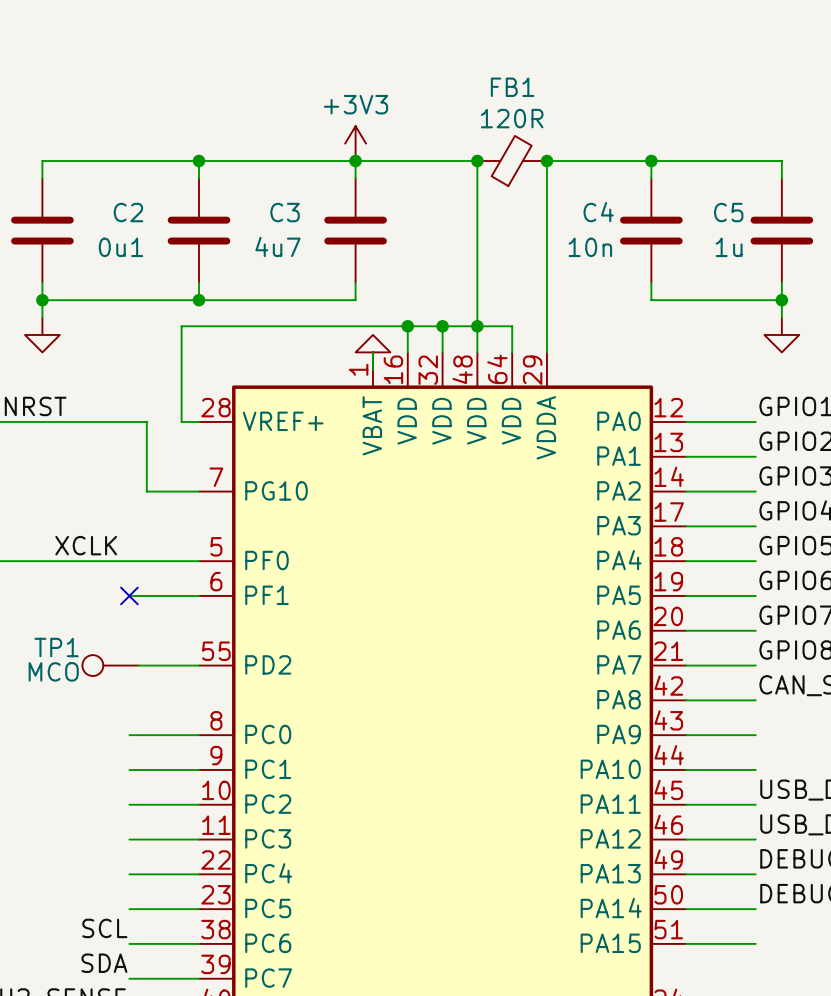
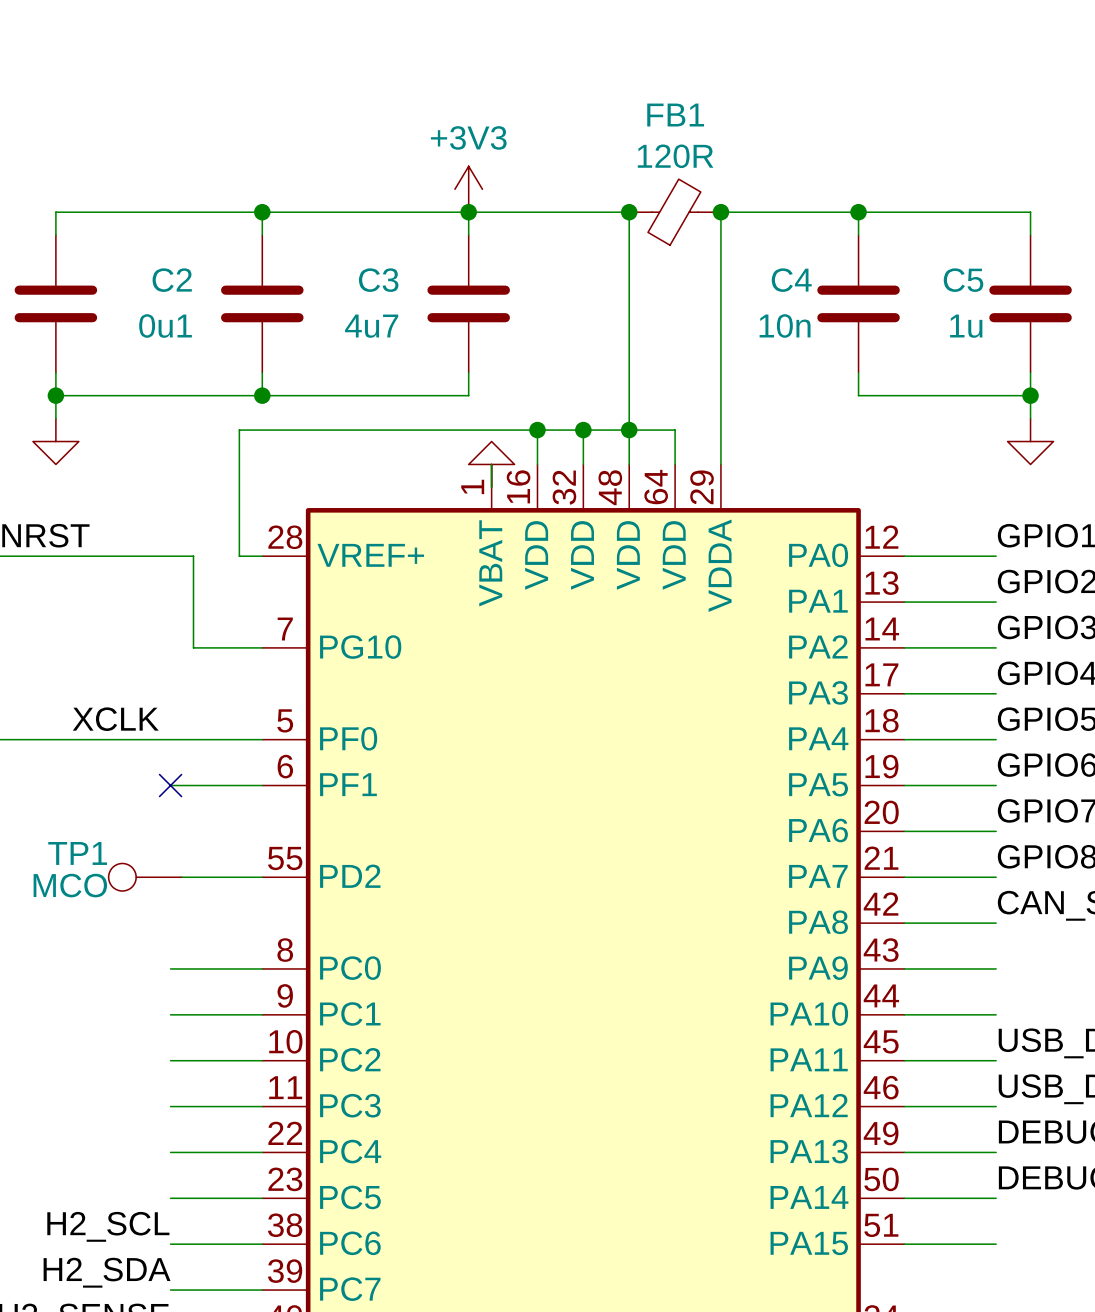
label: SCL (104, 928) -> H2_SCL (108, 1226)
label: SDA (104, 963) -> H2_SDA (107, 1272)

